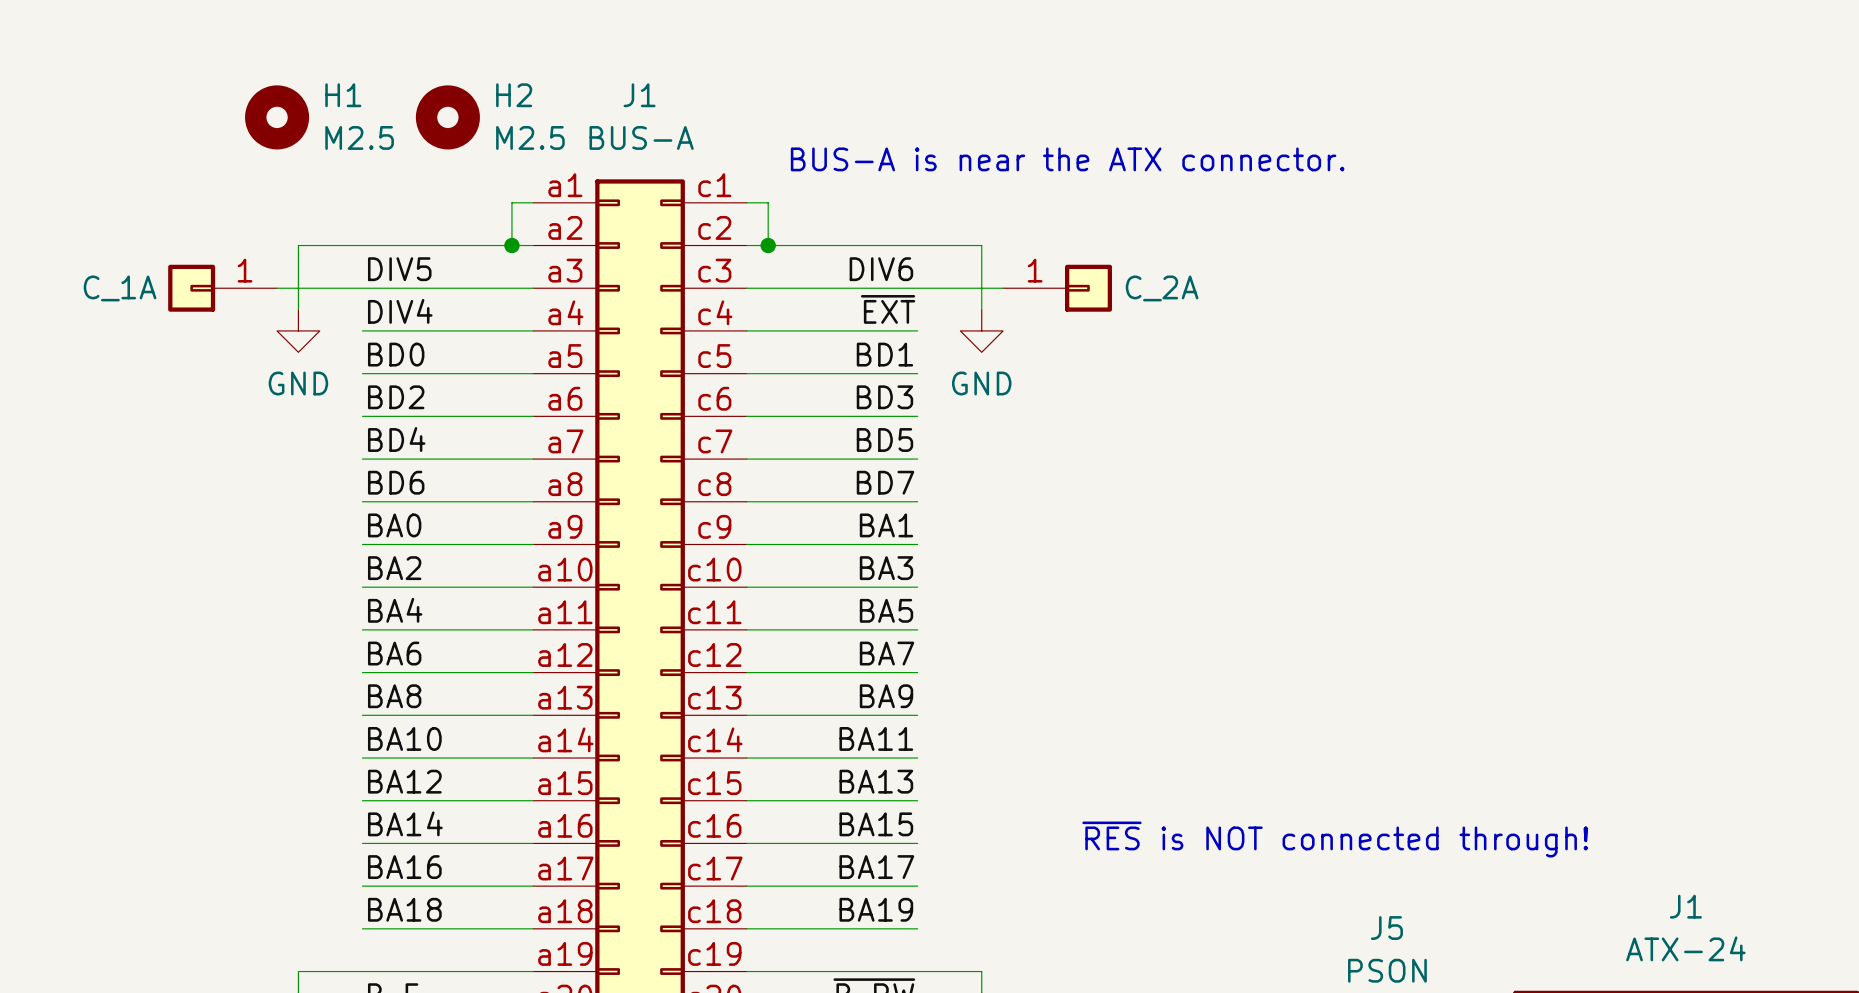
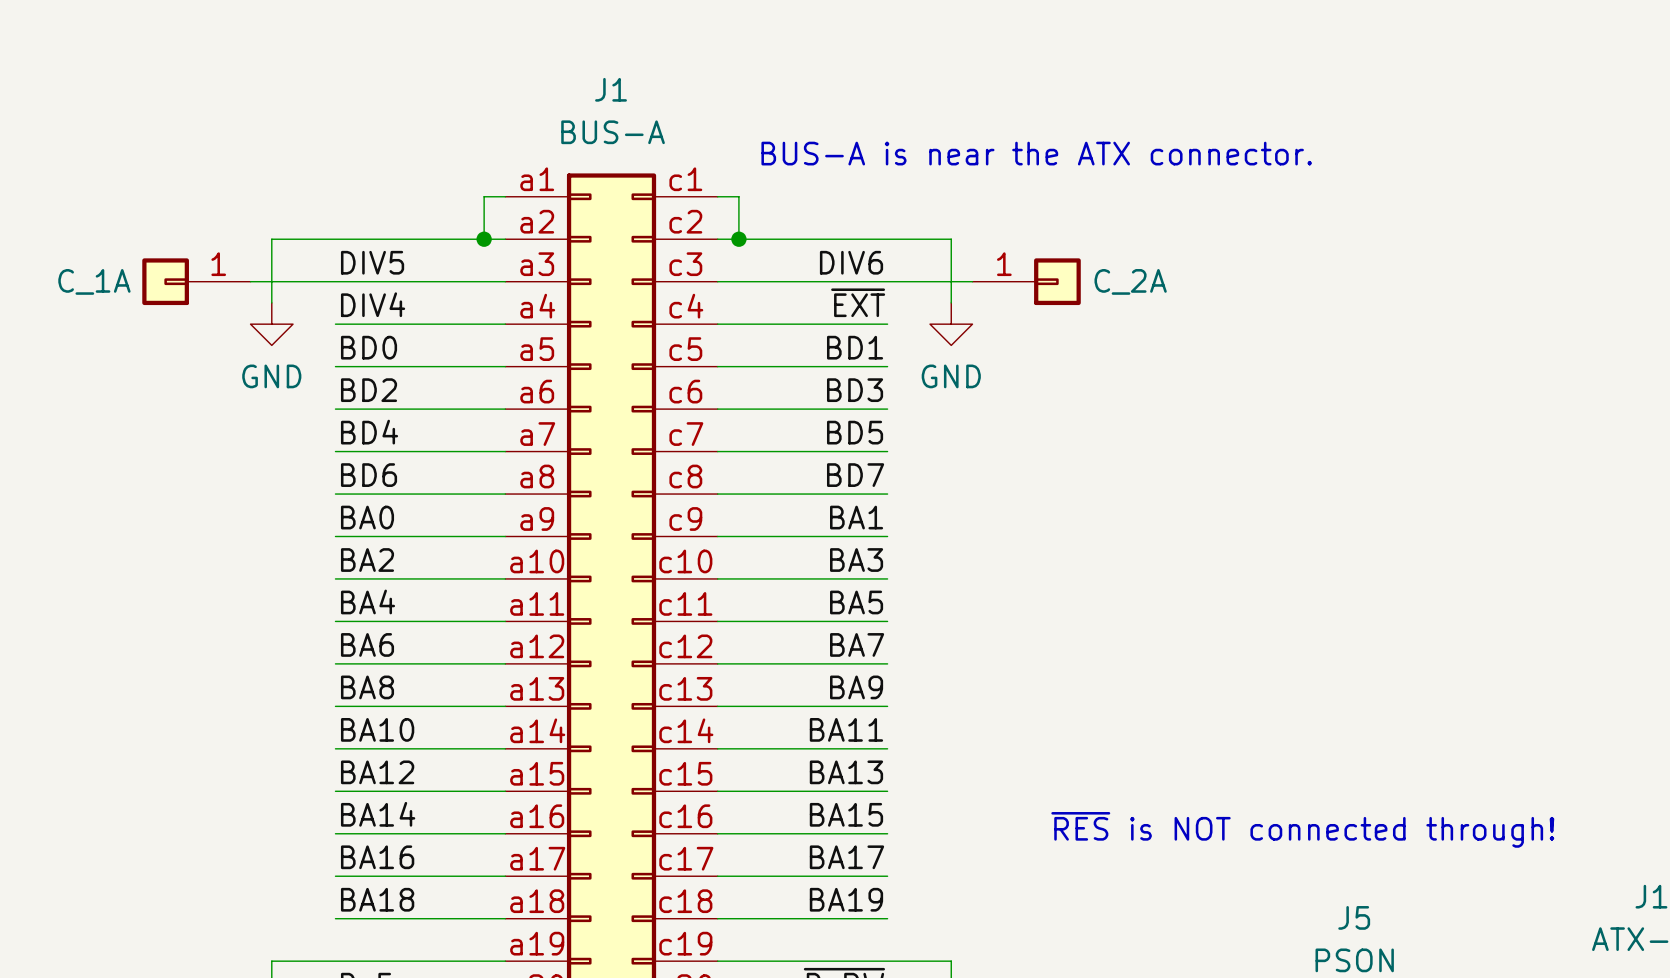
H1: M2.5 (277, 117) -> none
H2: M2.5 (447, 117) -> none

